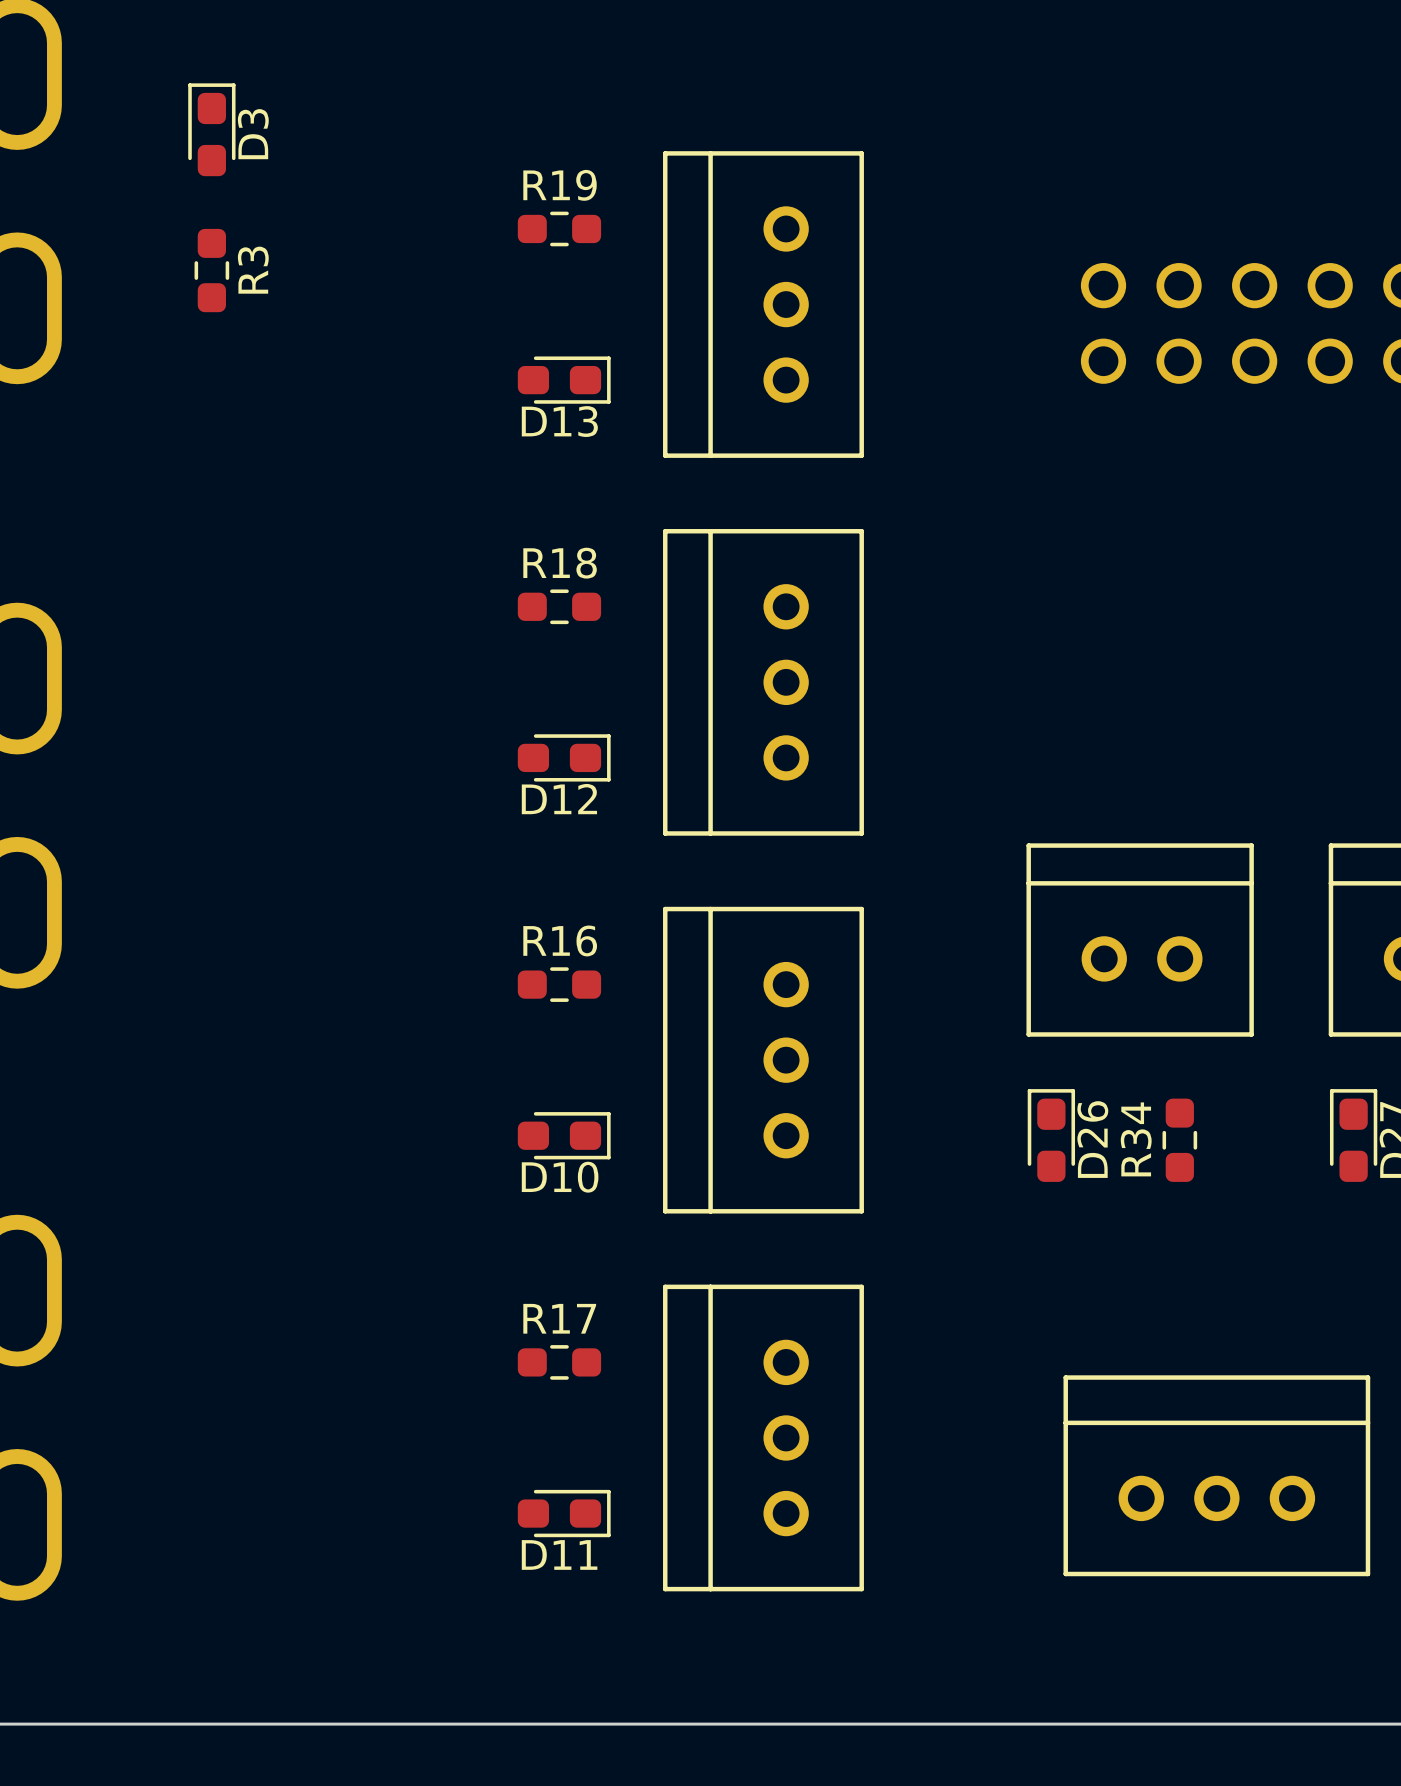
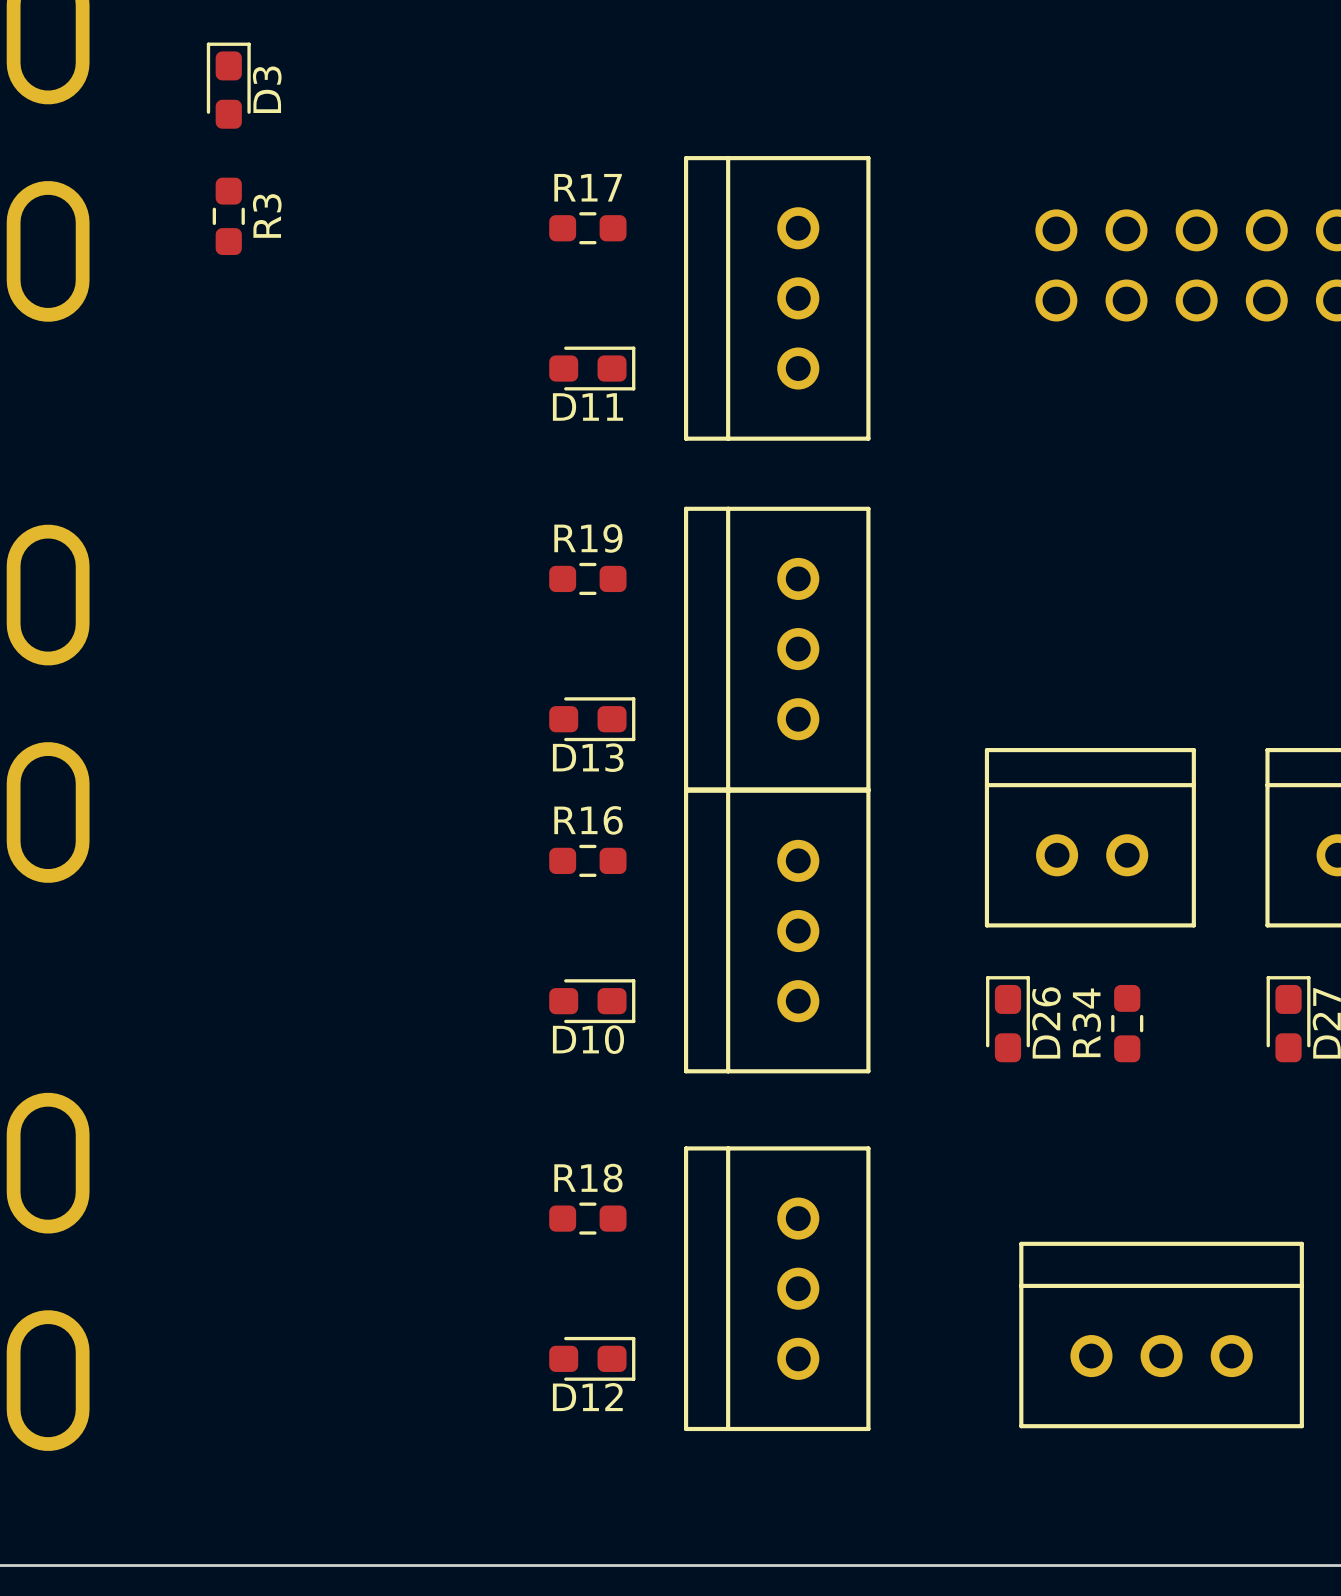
R19 position: (559, 228) -> (587, 578)
part position: (763, 304) -> (777, 298)
D13 position: (564, 380) -> (592, 719)
R18 position: (559, 606) -> (587, 1218)
part position: (763, 682) -> (777, 649)
D12 position: (564, 757) -> (592, 1358)
R16 position: (559, 984) -> (587, 860)
part position: (763, 1060) -> (777, 931)
D10 position: (564, 1135) -> (592, 1001)
R17 position: (559, 1362) -> (587, 228)
part position: (763, 1437) -> (777, 1288)
D11 position: (564, 1513) -> (592, 368)

